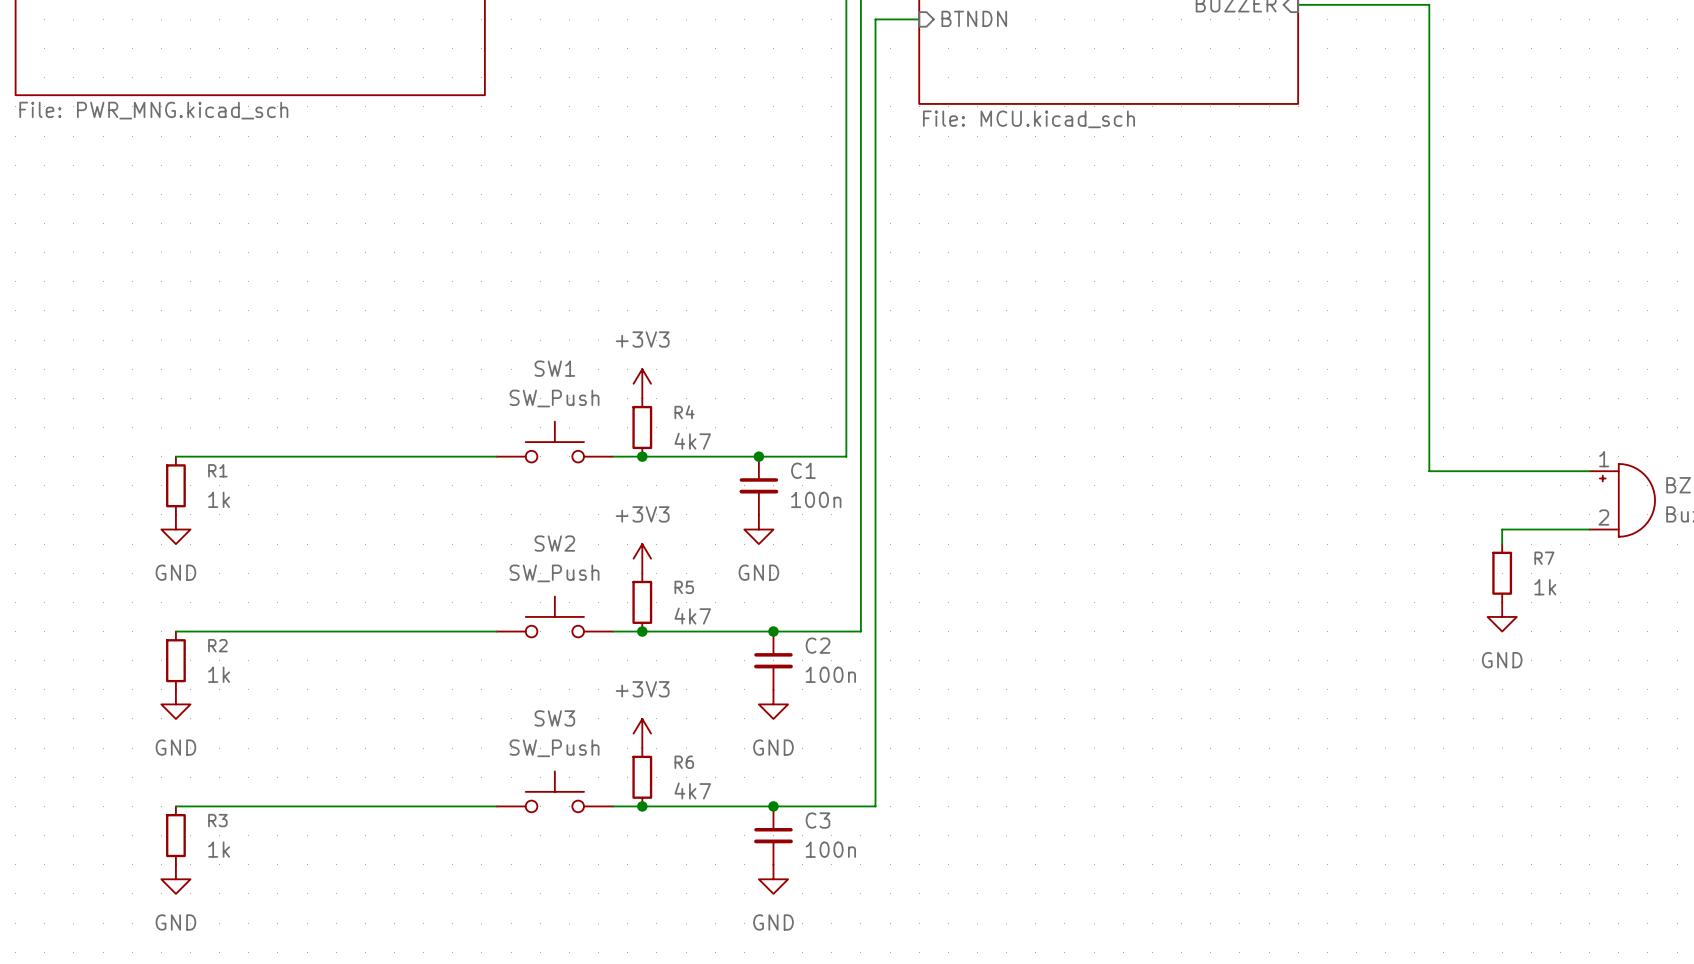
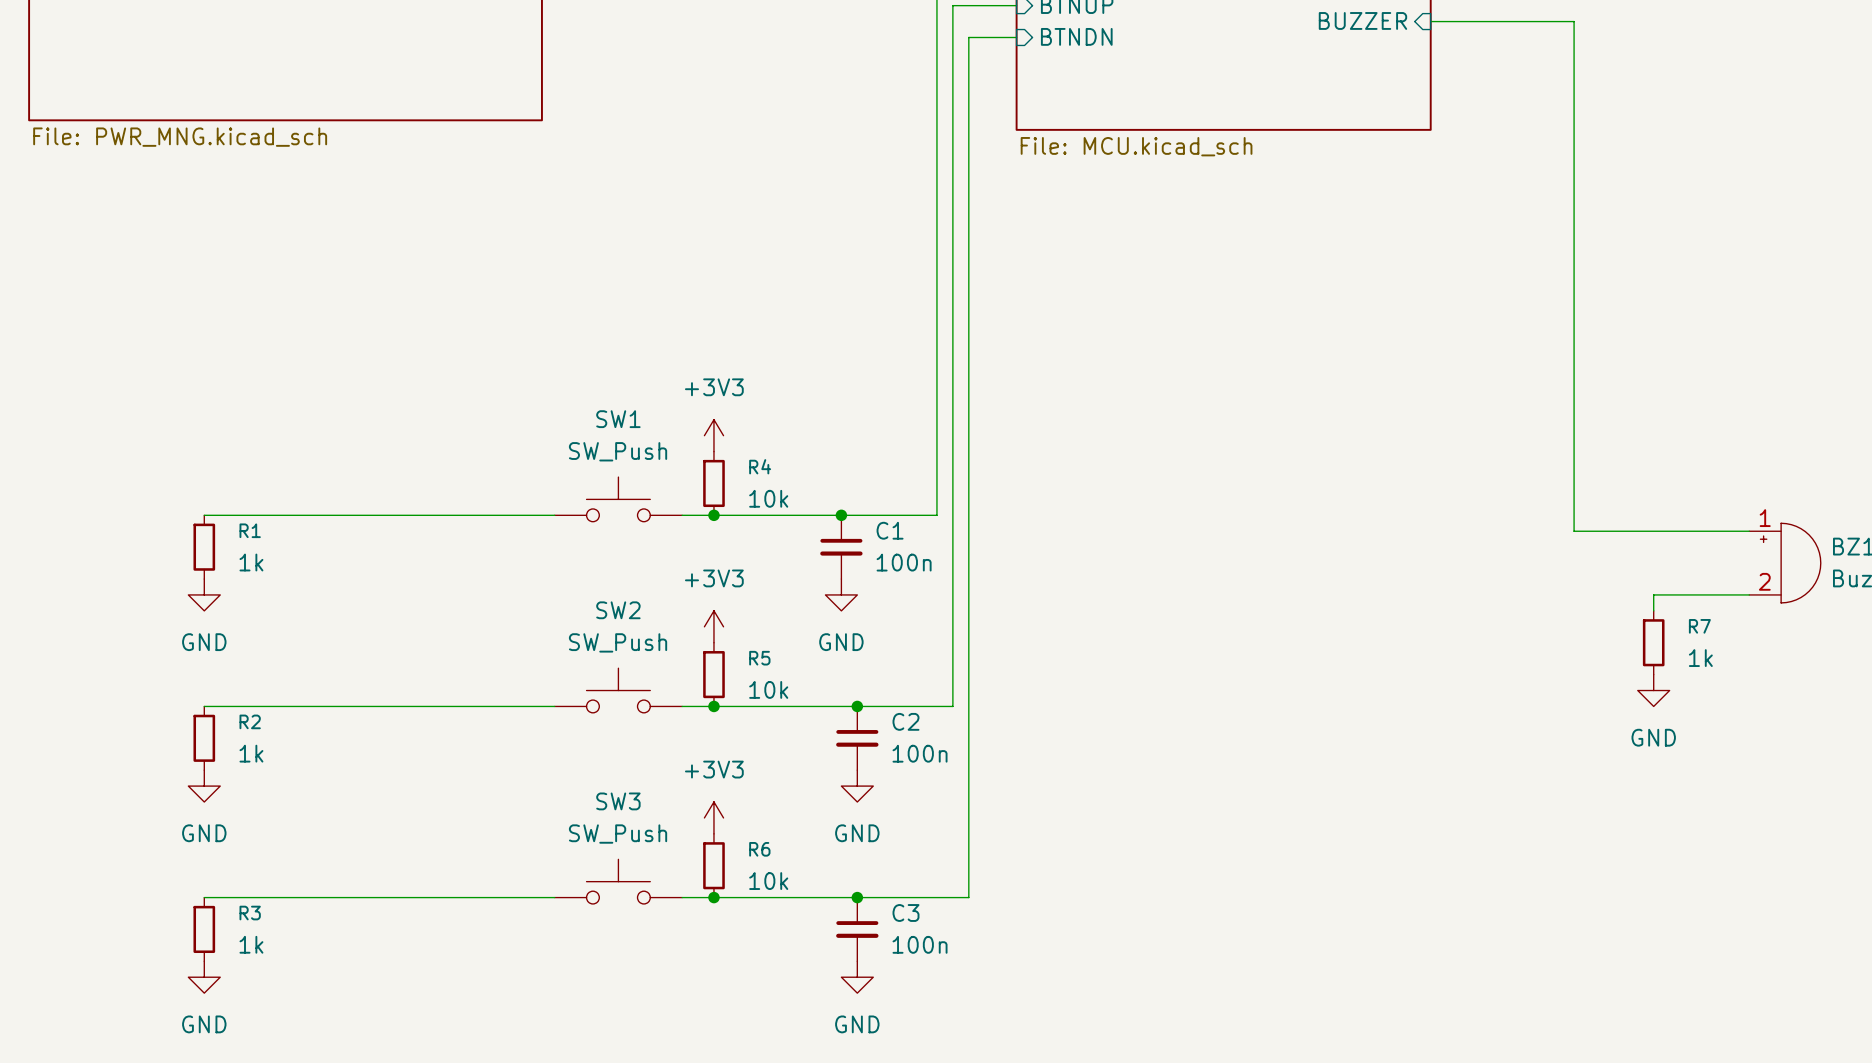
R4 value: 4k7 (692, 441) -> 10k (768, 498)
R5 value: 4k7 (692, 616) -> 10k (768, 689)
R6 value: 4k7 (692, 790) -> 10k (768, 881)

